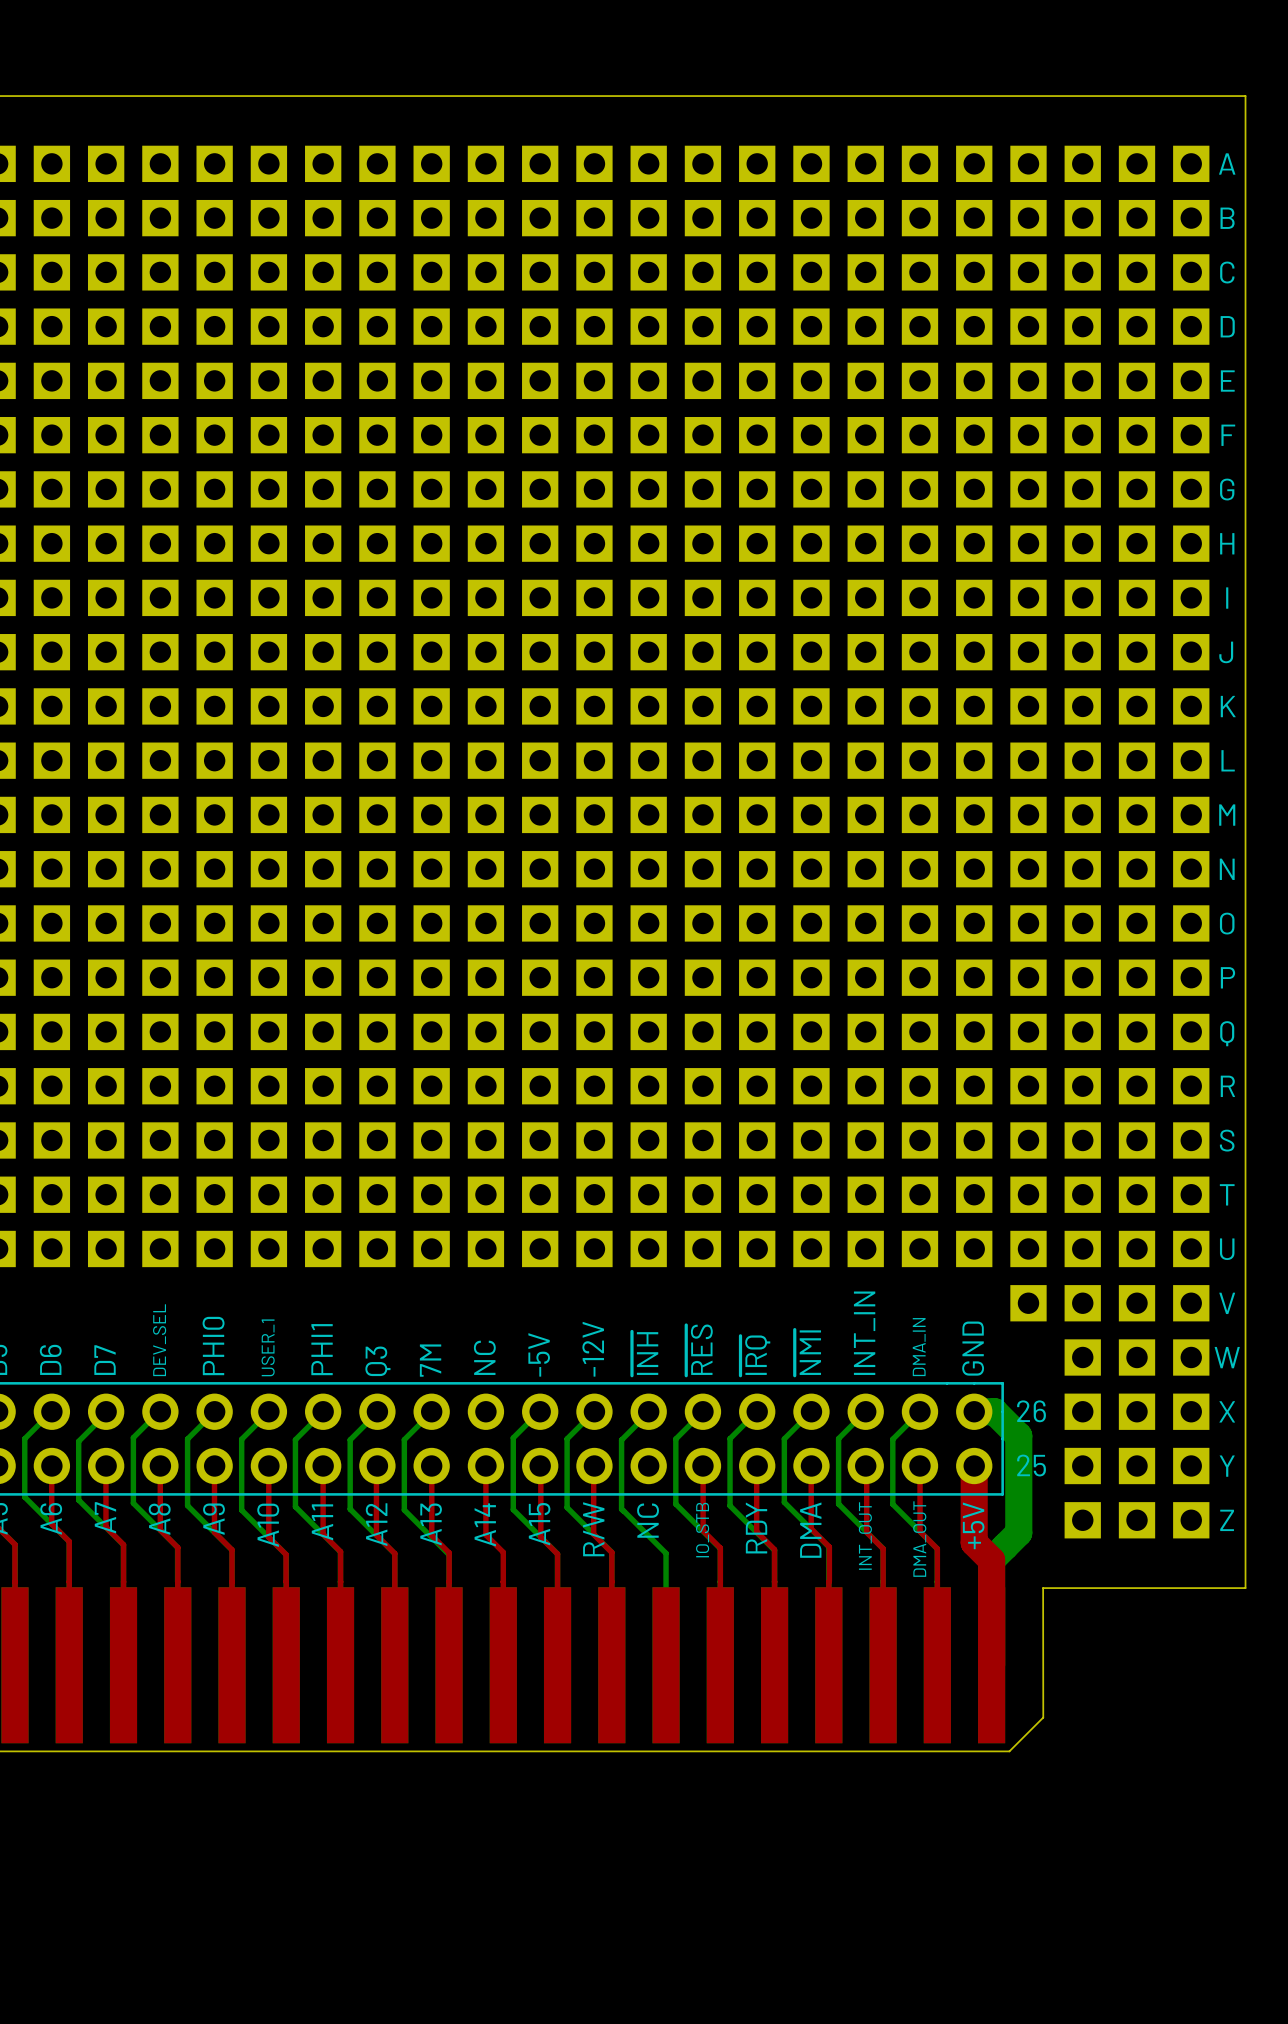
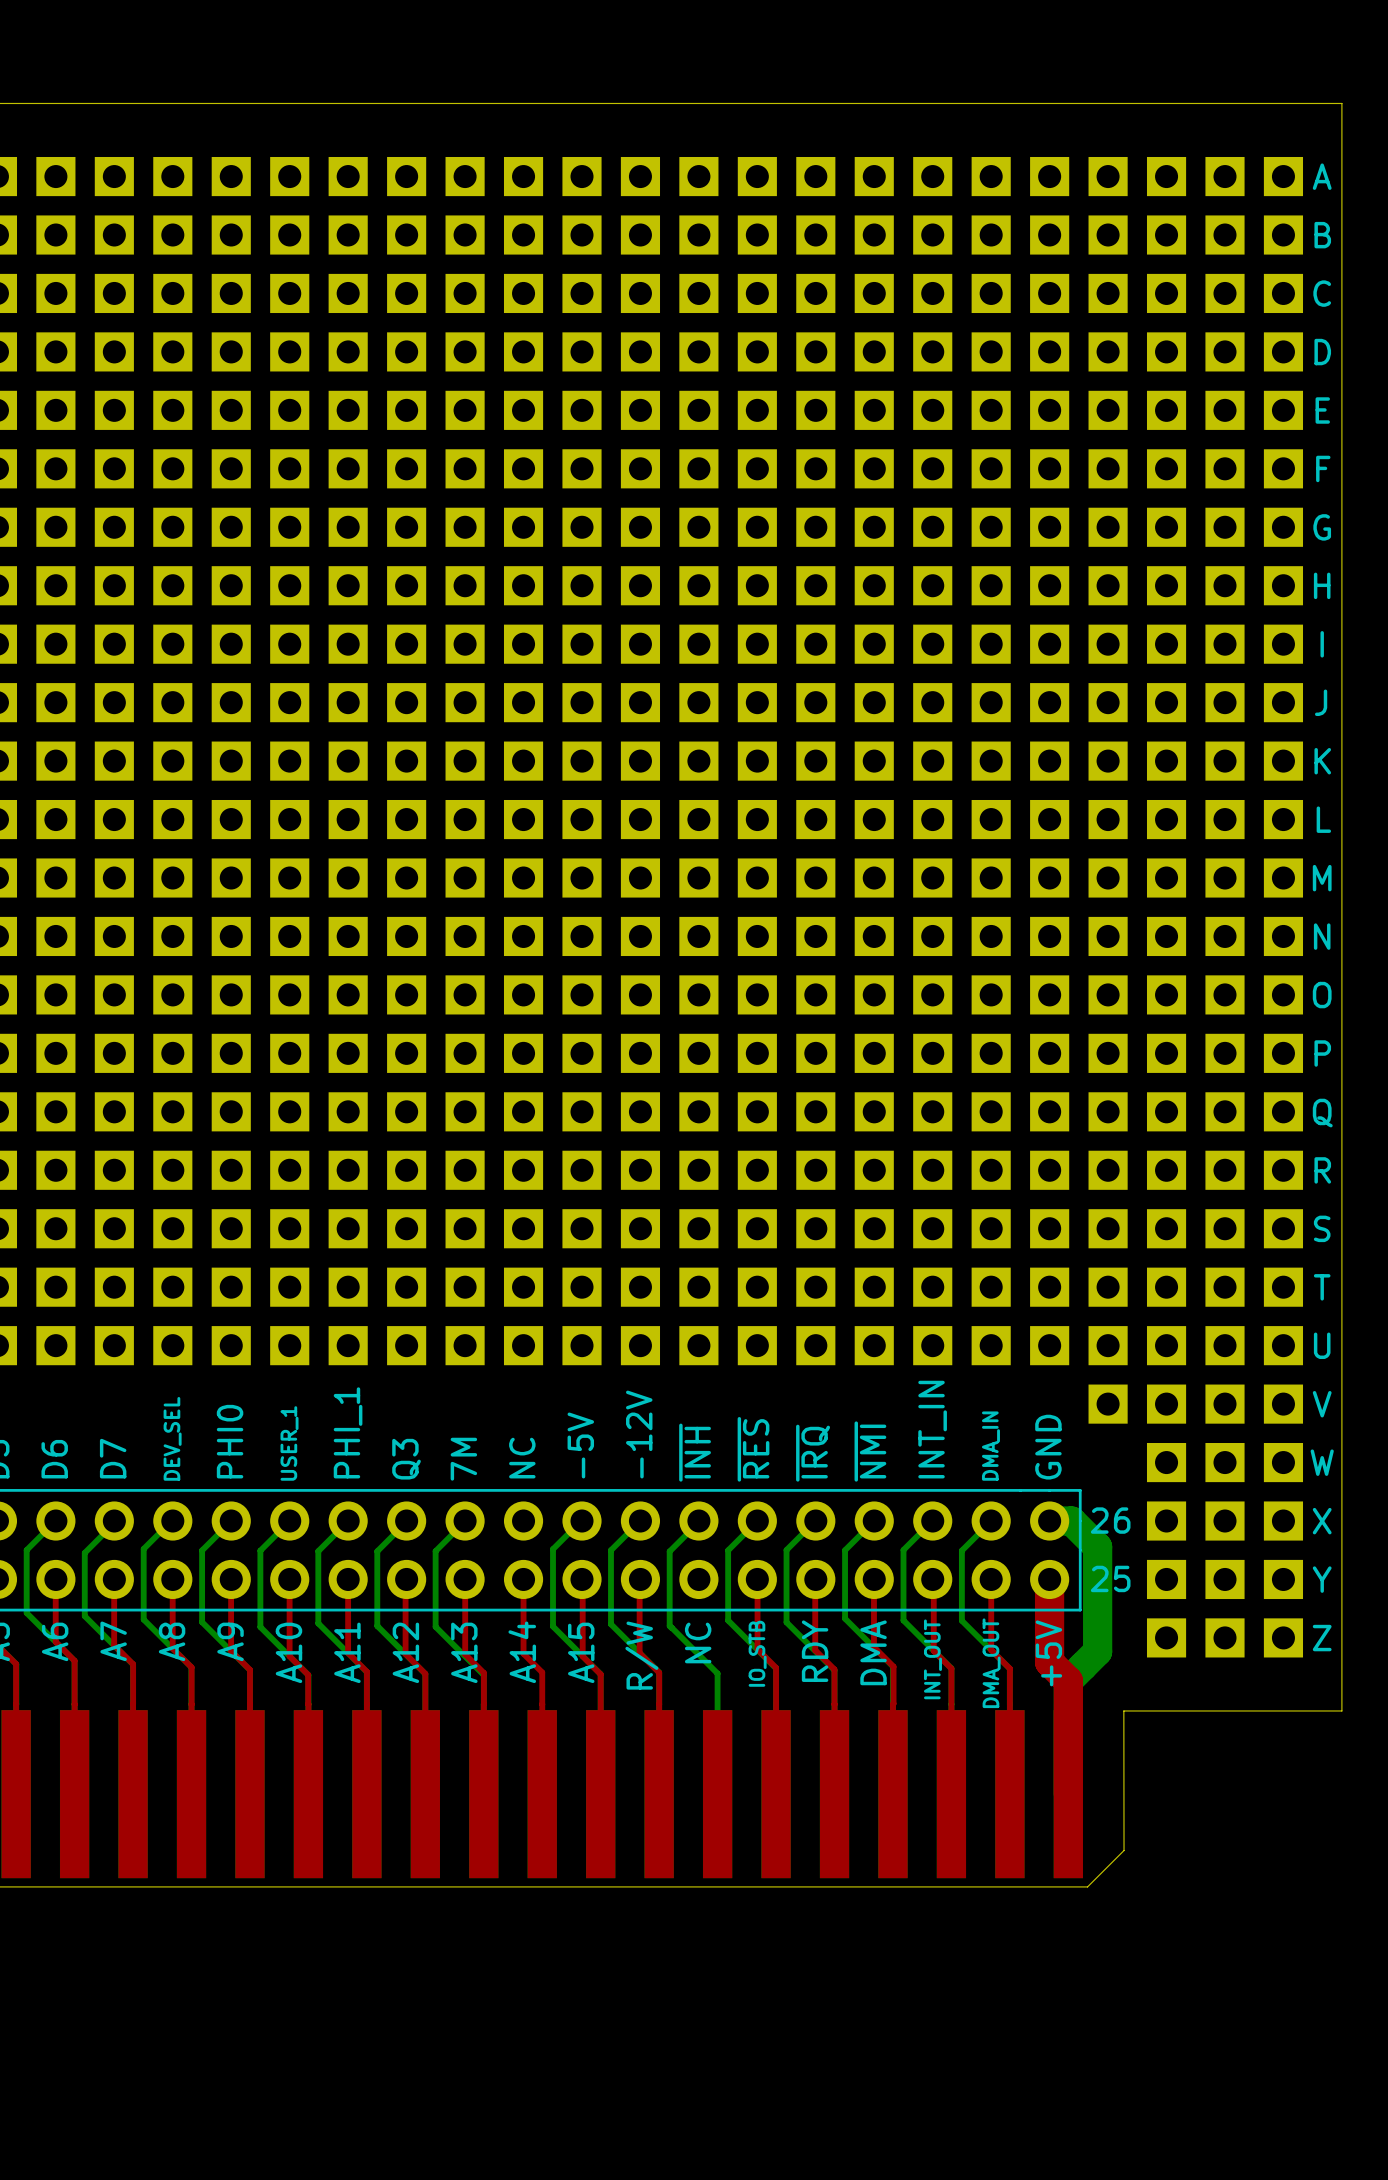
text: PHI1 (322, 1349) -> PHI_1 (348, 1432)

